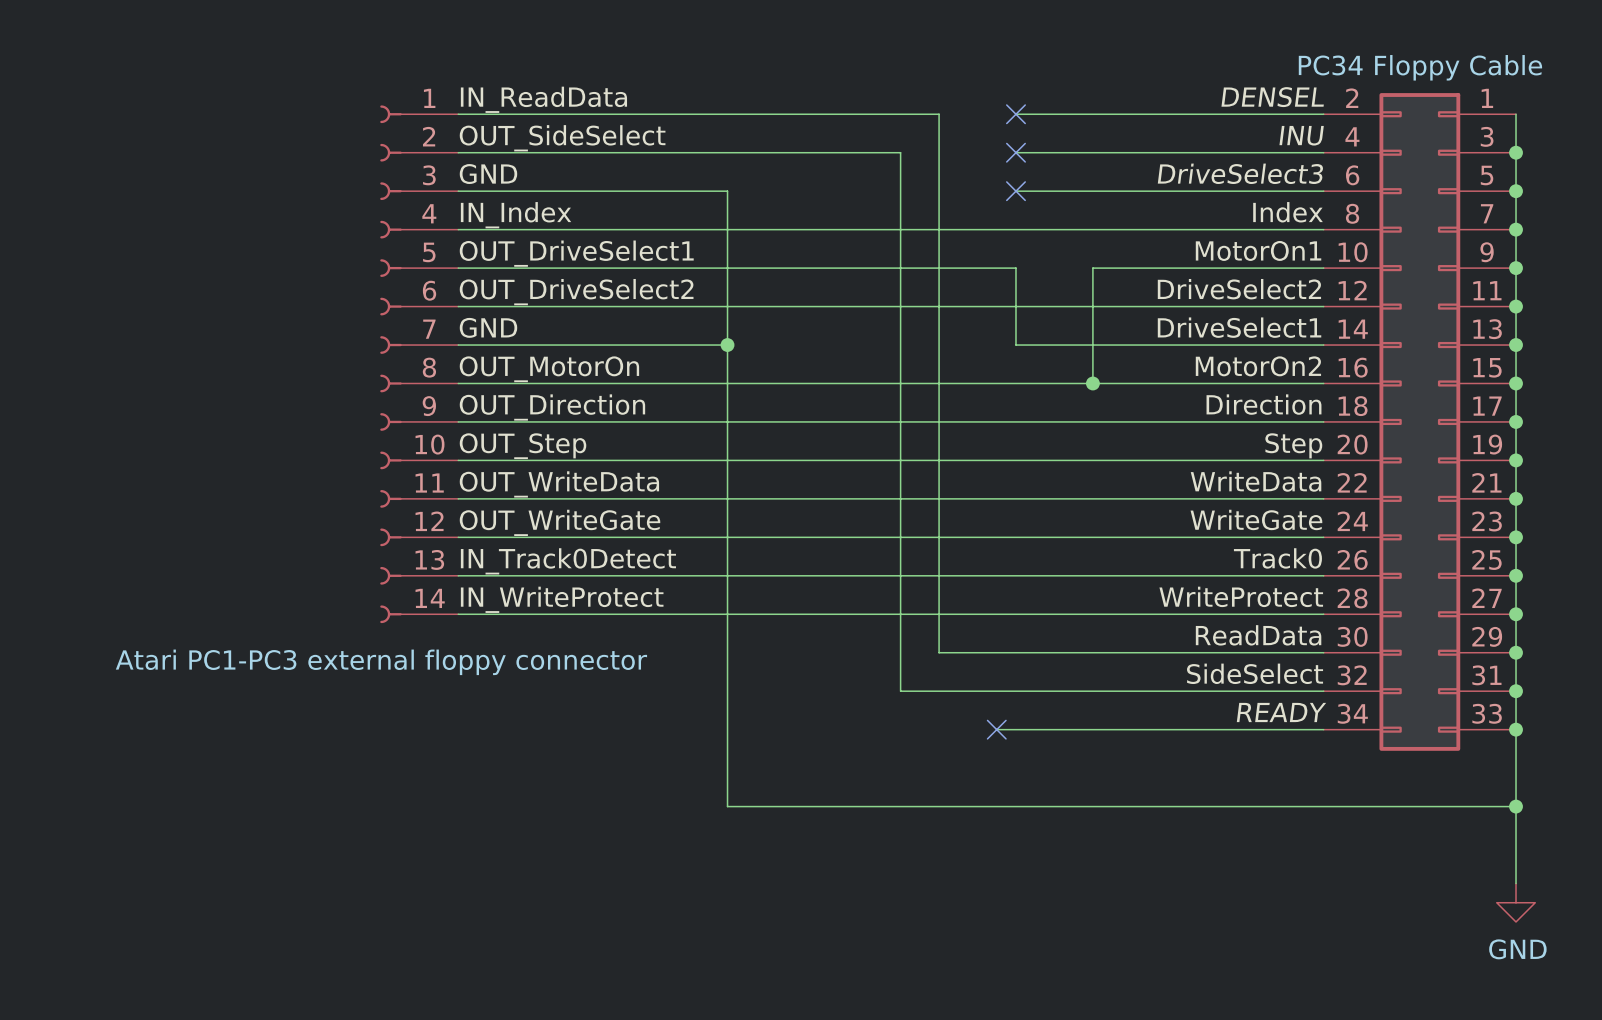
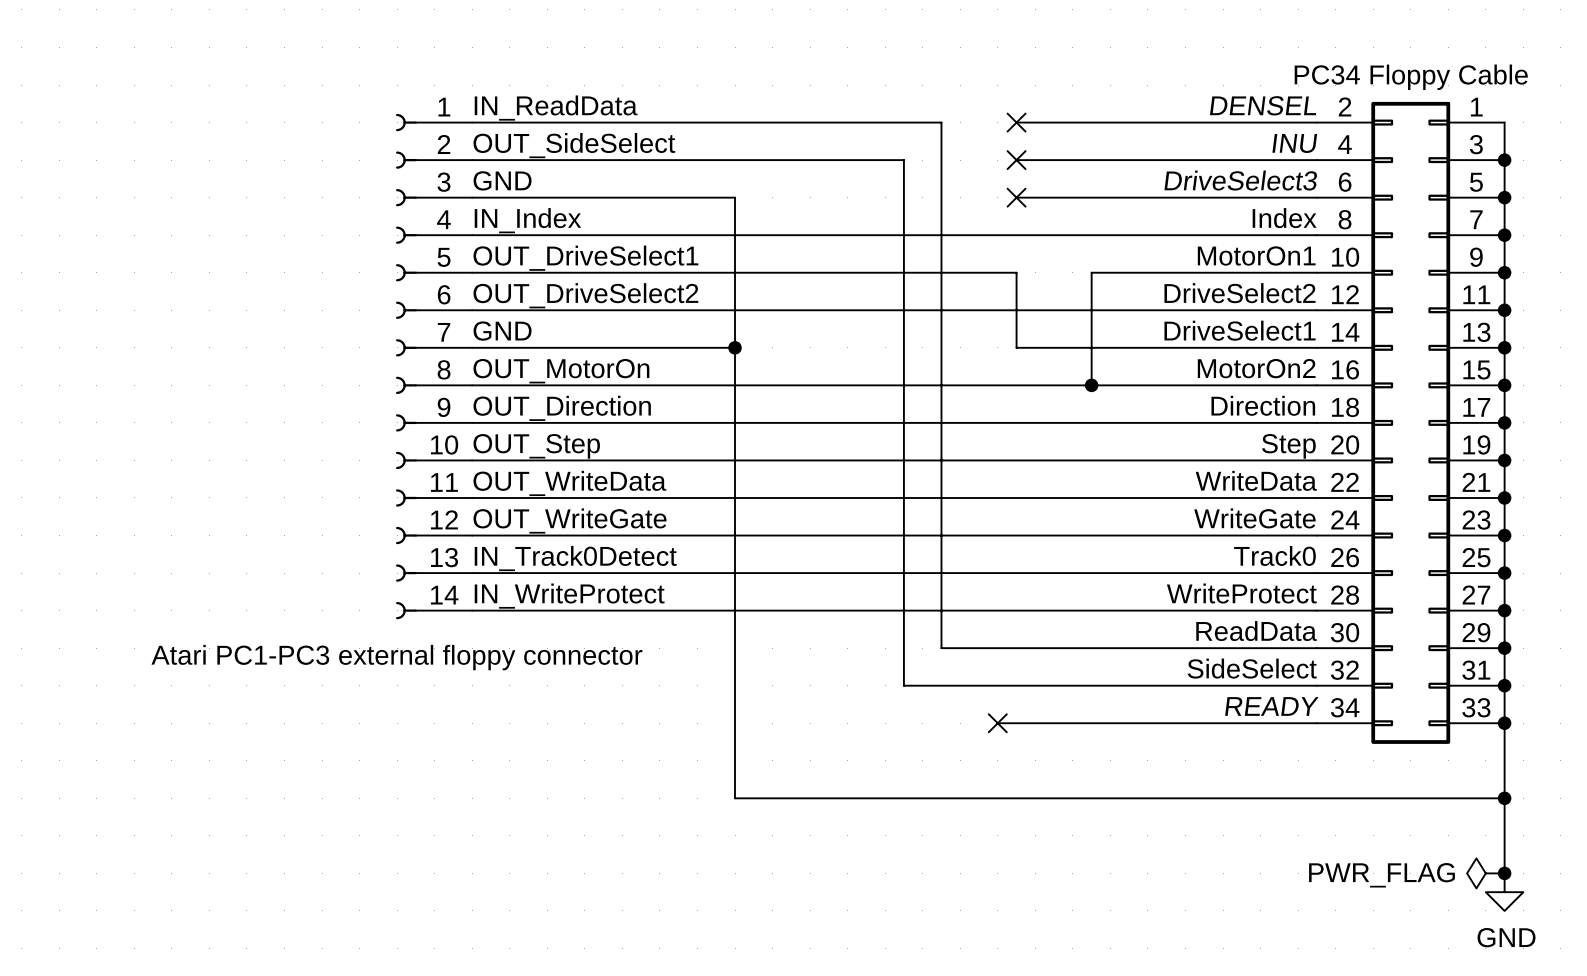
power symbol: none -> PWR_FLAG (1485, 873)
junction: none -> (1504, 873)

